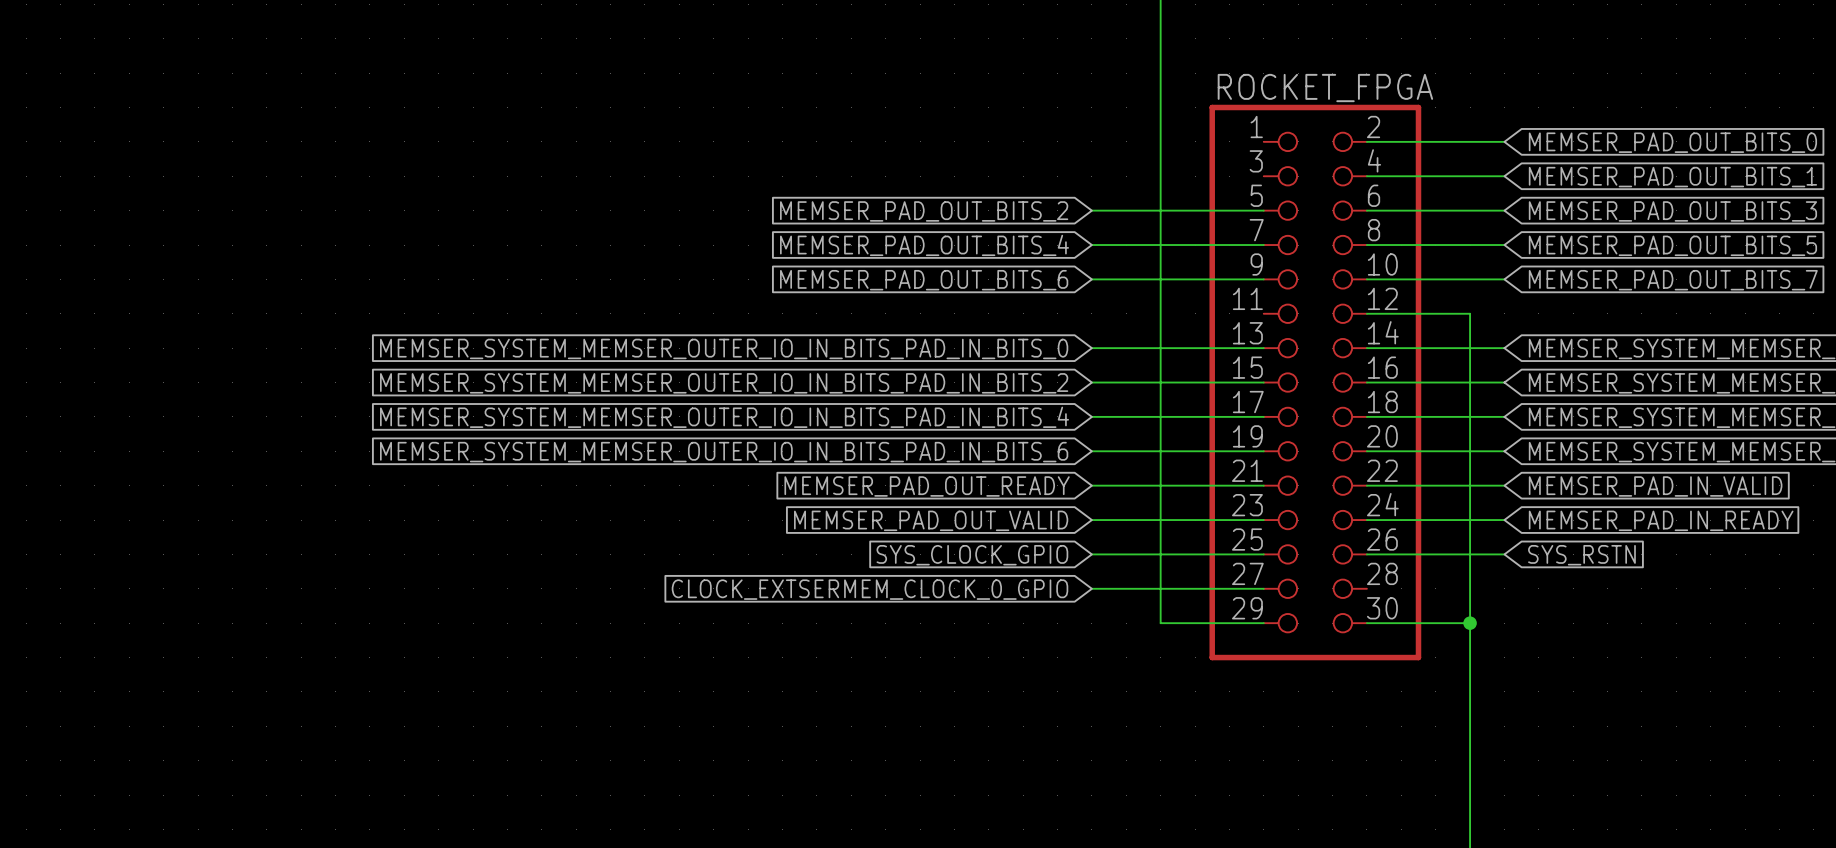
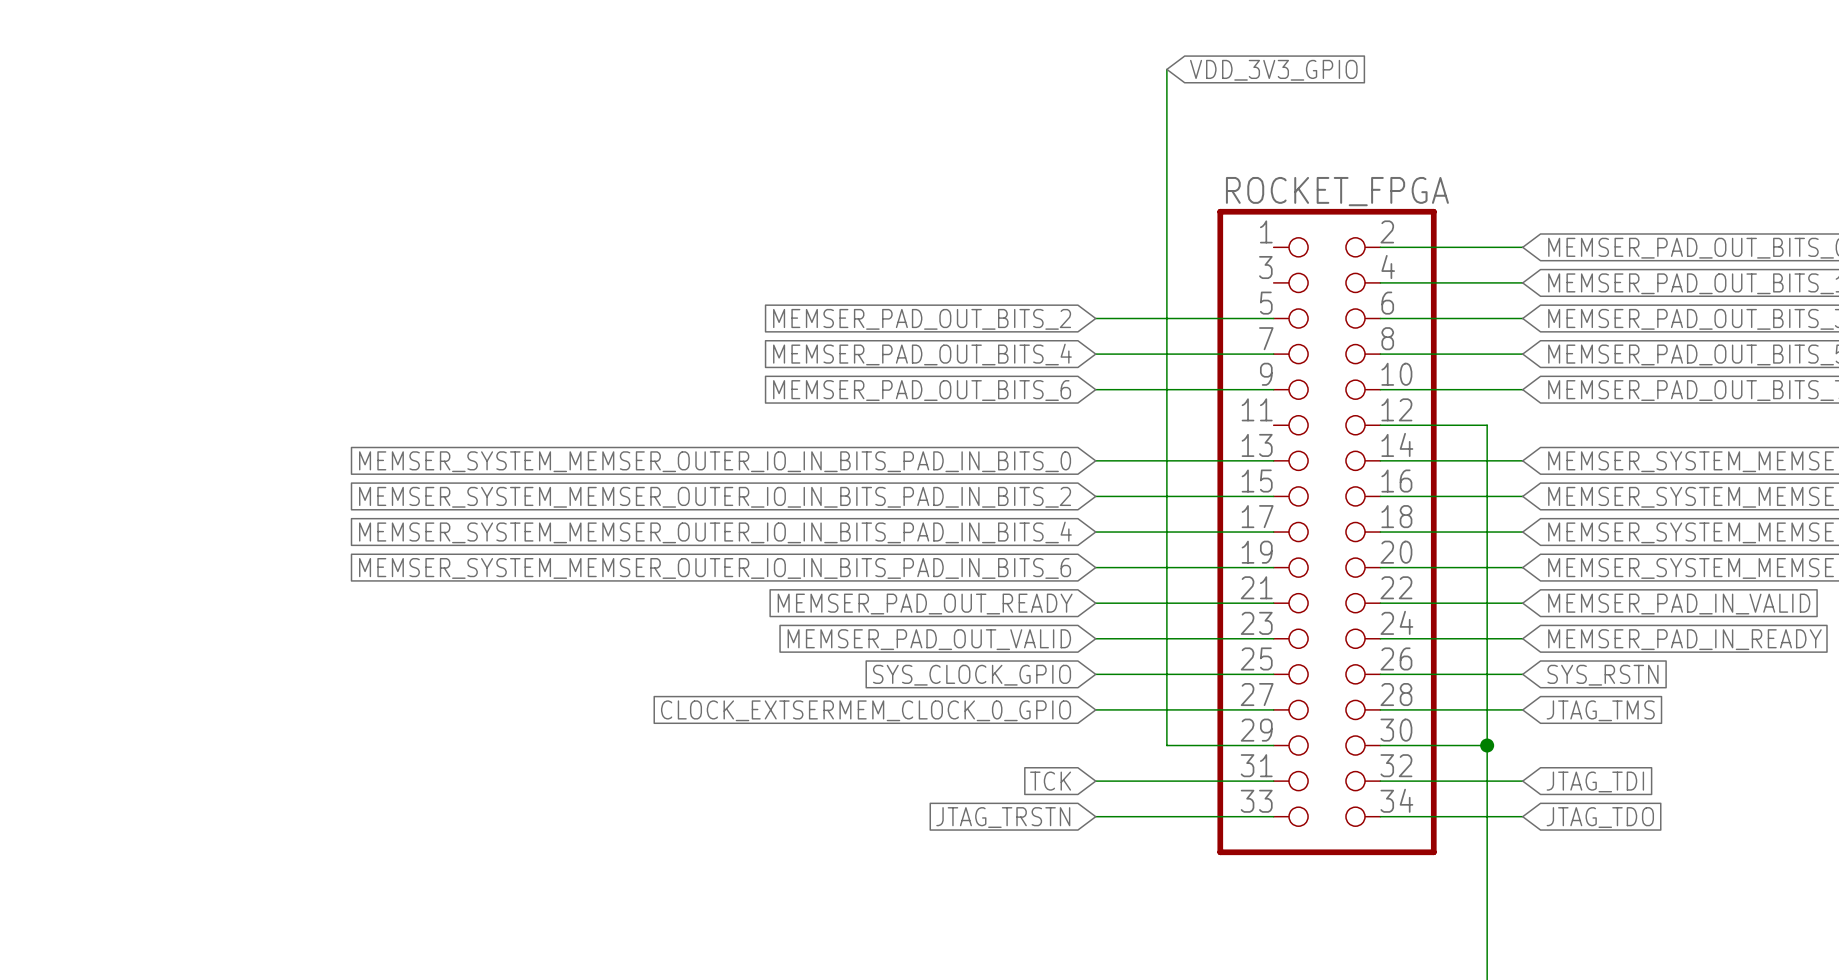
ROCKET_FPGA: (1315, 382) -> none
ROCKET_FPGA: none -> (1327, 532)
wire: none -> (1380, 709) (1522, 709)
global label: none -> JTAG_TMS (1600, 710)
global label: none -> TCK (1050, 781)
wire: none -> (1095, 781) (1273, 781)
wire: none -> (1380, 781) (1522, 781)
global label: none -> JTAG_TDI (1595, 781)
wire: none -> (1095, 816) (1273, 816)
wire: none -> (1380, 816) (1522, 816)
global label: none -> JTAG_TRSTN (1003, 817)
global label: none -> JTAG_TDO (1600, 817)

